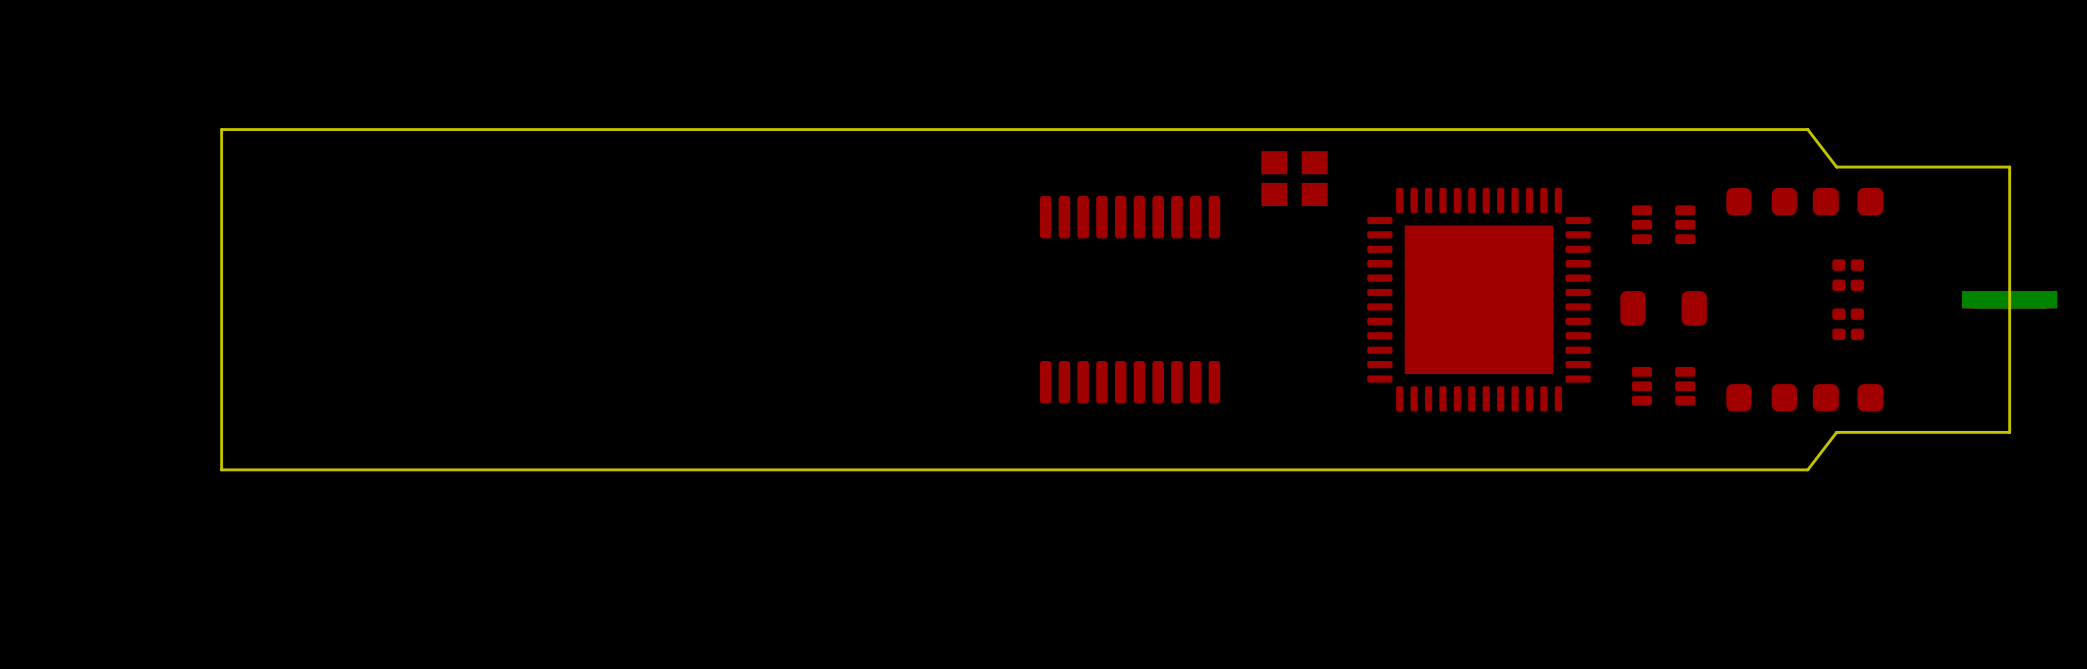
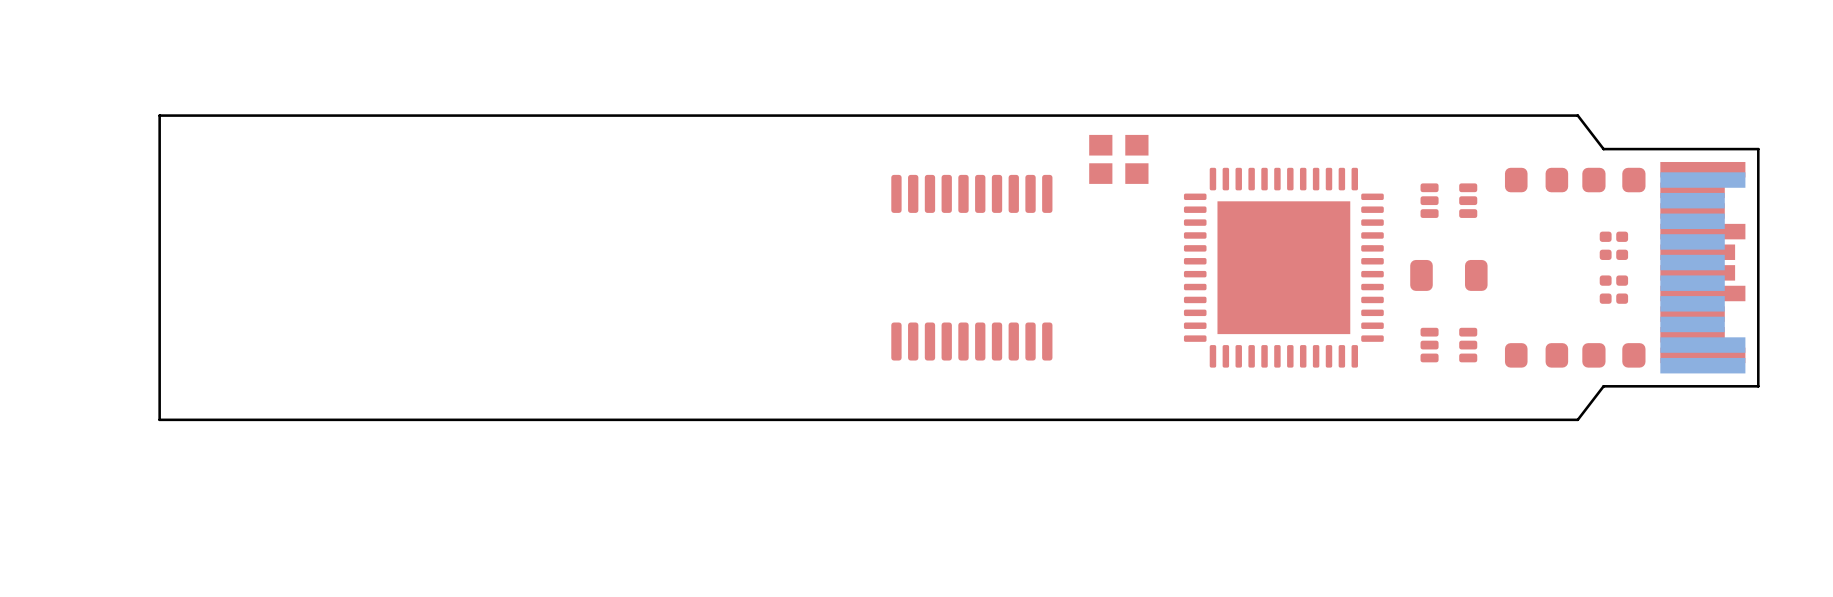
part: none -> (1702, 267)
part: (2009, 299) -> none

